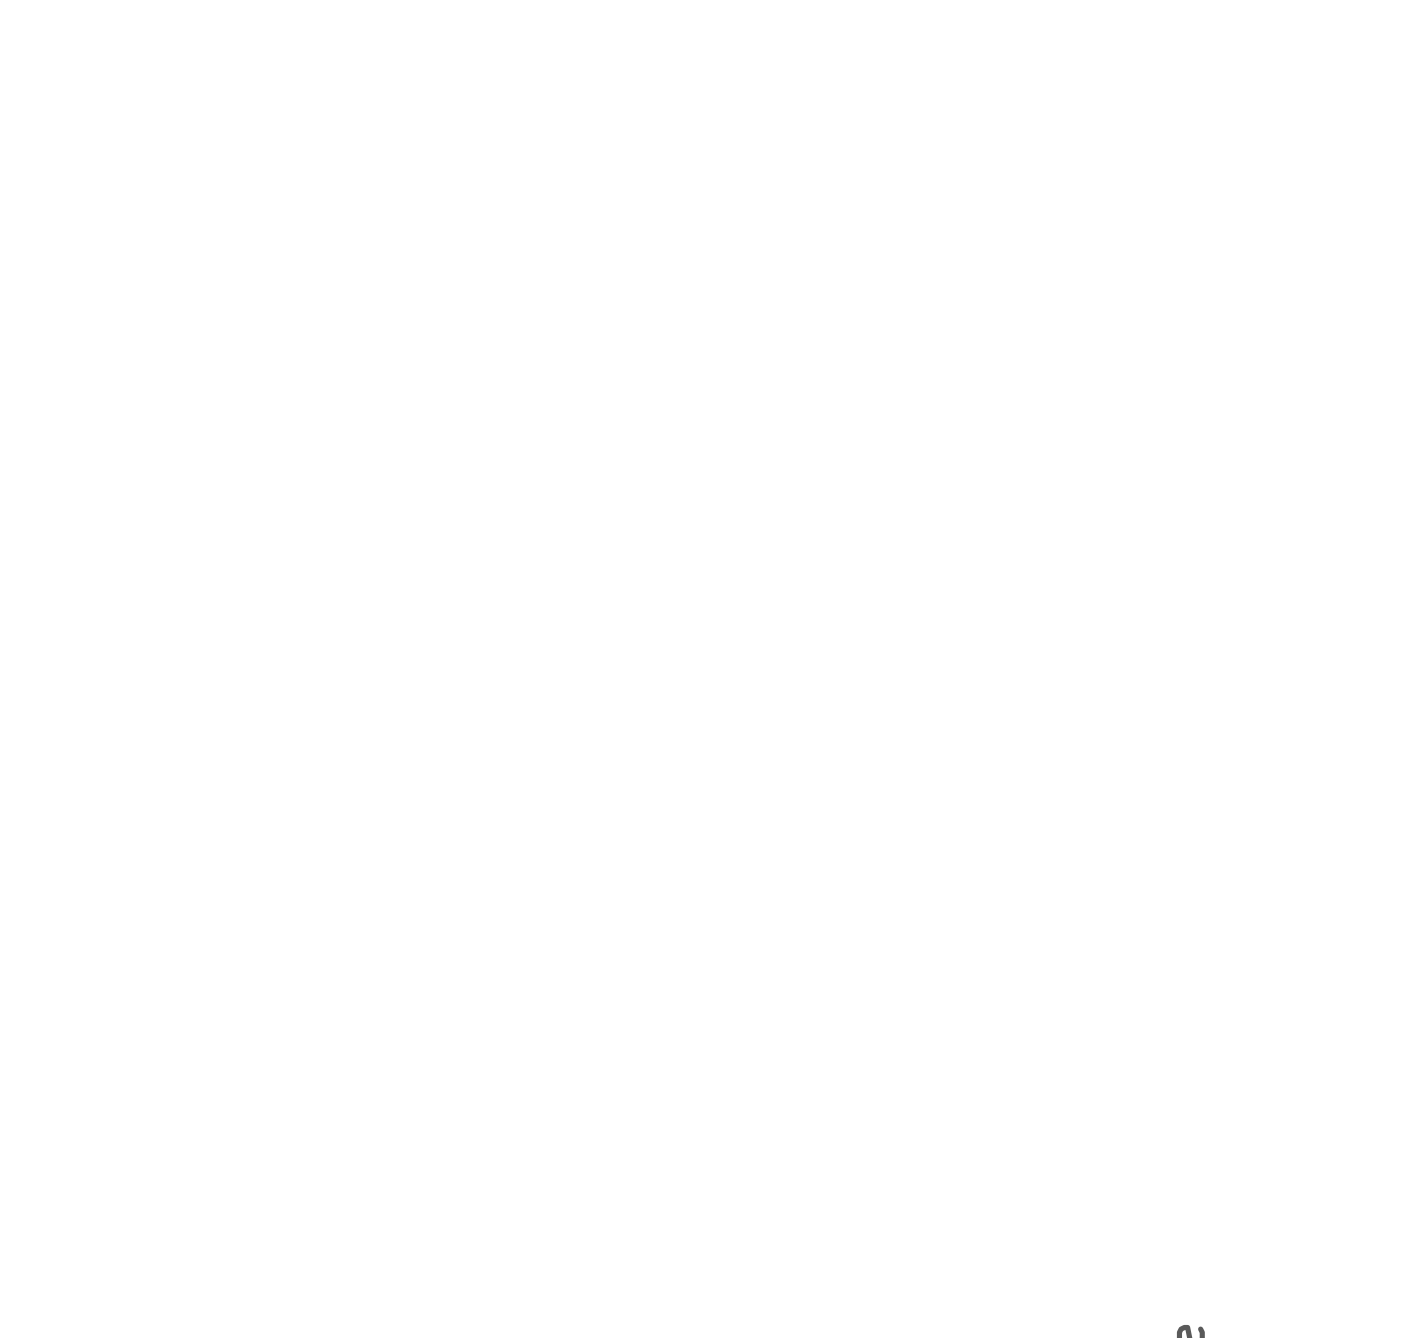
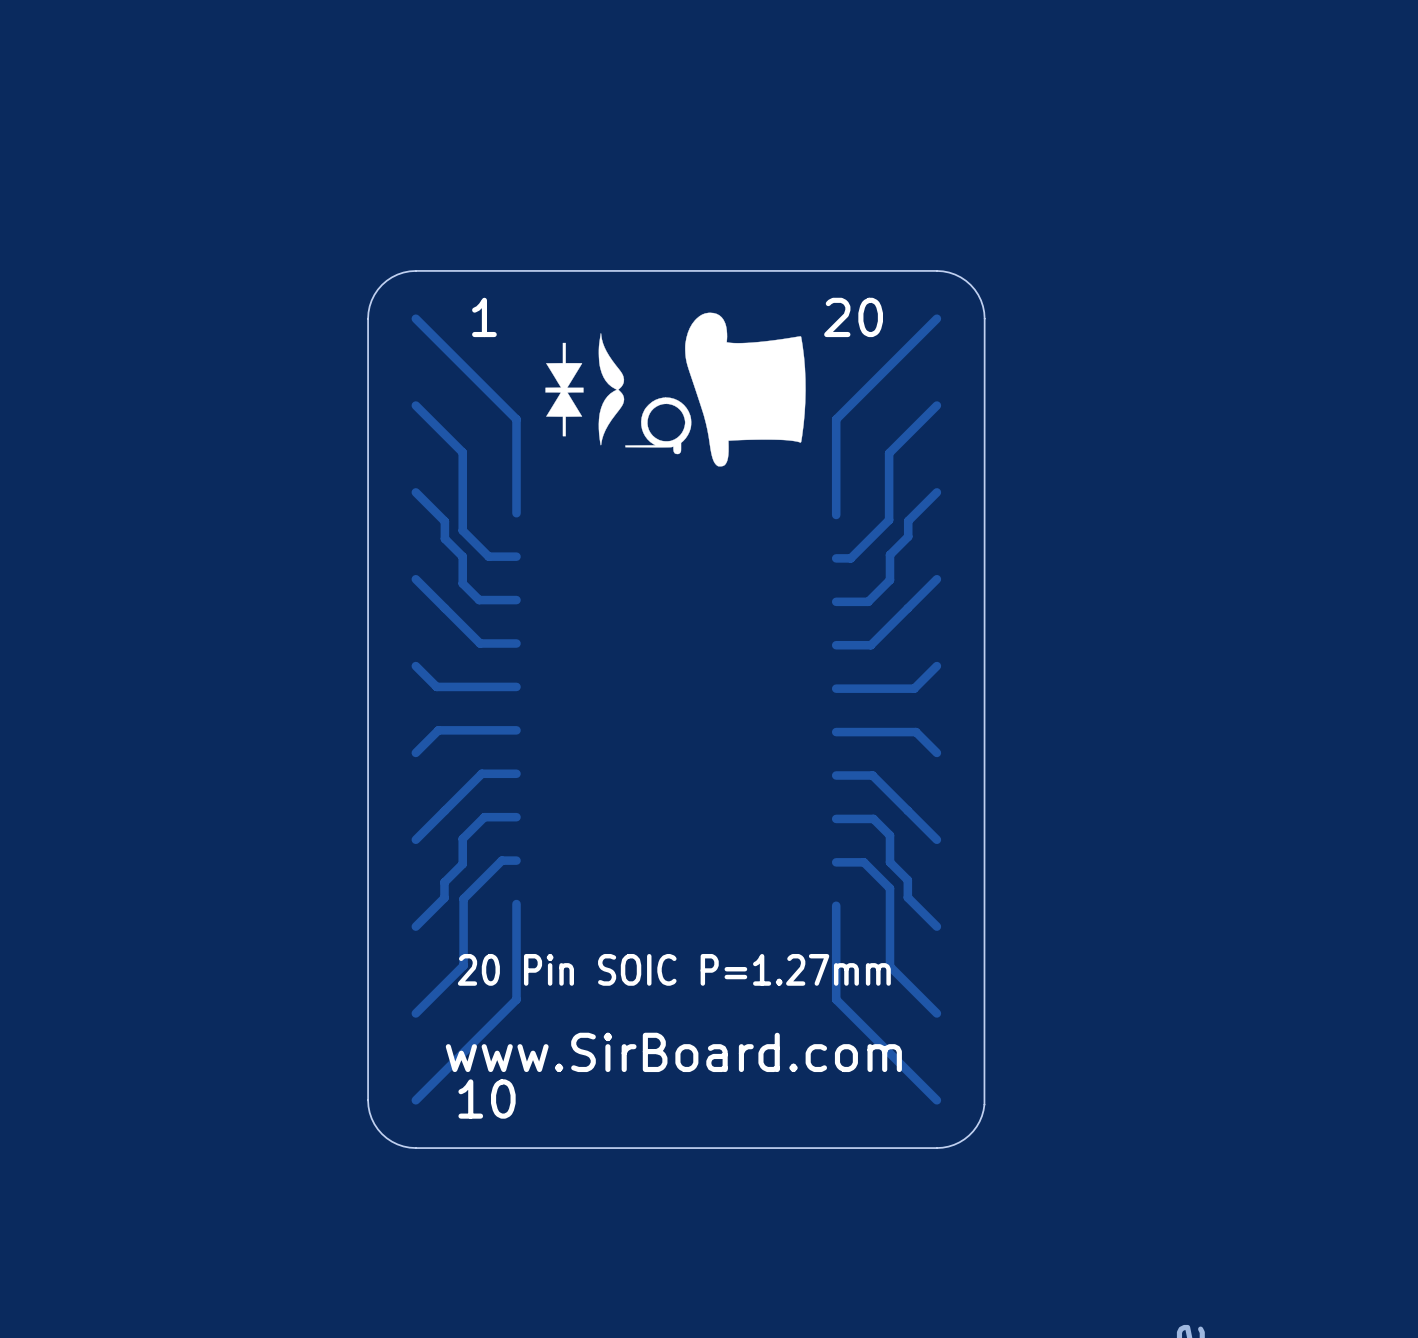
board edge: none -> (415, 270) (936, 270) (949, 272) (960, 277) (970, 284) (978, 294) (983, 306) (984, 318) (984, 1104) (979, 1121) (964, 1139) (948, 1146) (936, 1148) (415, 1148) (403, 1146) (391, 1141) (382, 1134) (374, 1124) (369, 1112) (368, 1100) (368, 318) (371, 300) (382, 284) (397, 274) (415, 270)
drawing: none -> [545, 312, 806, 467]
text: none -> 1 (484, 317)
text: none -> 20 (853, 317)
track: none -> (415, 318) (516, 419) (516, 513)
track: none -> (936, 318) (836, 419) (836, 514)
track: none -> (415, 405) (462, 452) (462, 530) (488, 556) (516, 556)
track: none -> (936, 405) (889, 453) (889, 520) (850, 558) (836, 558)
track: none -> (415, 492) (444, 521) (444, 538) (462, 556) (462, 583) (479, 600) (516, 600)
track: none -> (936, 492) (908, 521) (908, 536) (889, 554) (889, 580) (868, 601) (836, 601)
track: none -> (415, 579) (480, 643) (516, 643)
track: none -> (936, 579) (870, 645) (836, 645)
track: none -> (415, 666) (436, 686) (516, 686)
track: none -> (936, 666) (914, 688) (836, 688)
track: none -> (516, 730) (438, 730) (415, 752)
track: none -> (836, 732) (916, 732) (936, 752)
track: none -> (516, 773) (481, 773) (415, 839)
track: none -> (836, 775) (872, 775) (936, 839)
track: none -> (516, 817) (484, 817) (462, 838) (462, 864) (444, 882) (444, 897) (415, 926)
track: none -> (836, 818) (873, 818) (889, 835) (889, 862) (907, 880) (907, 897) (936, 926)
track: none -> (516, 860) (501, 860) (463, 898) (463, 965) (415, 1013)
track: none -> (836, 862) (863, 862) (889, 888) (889, 966) (936, 1013)
track: none -> (516, 904) (516, 999) (415, 1100)
track: none -> (836, 905) (836, 999) (936, 1100)
text: none -> 20 Pin SOIC P=1.27mm (674, 969)
text: none -> www.SirBoard.com (673, 1052)
text: none -> 10 (487, 1099)

